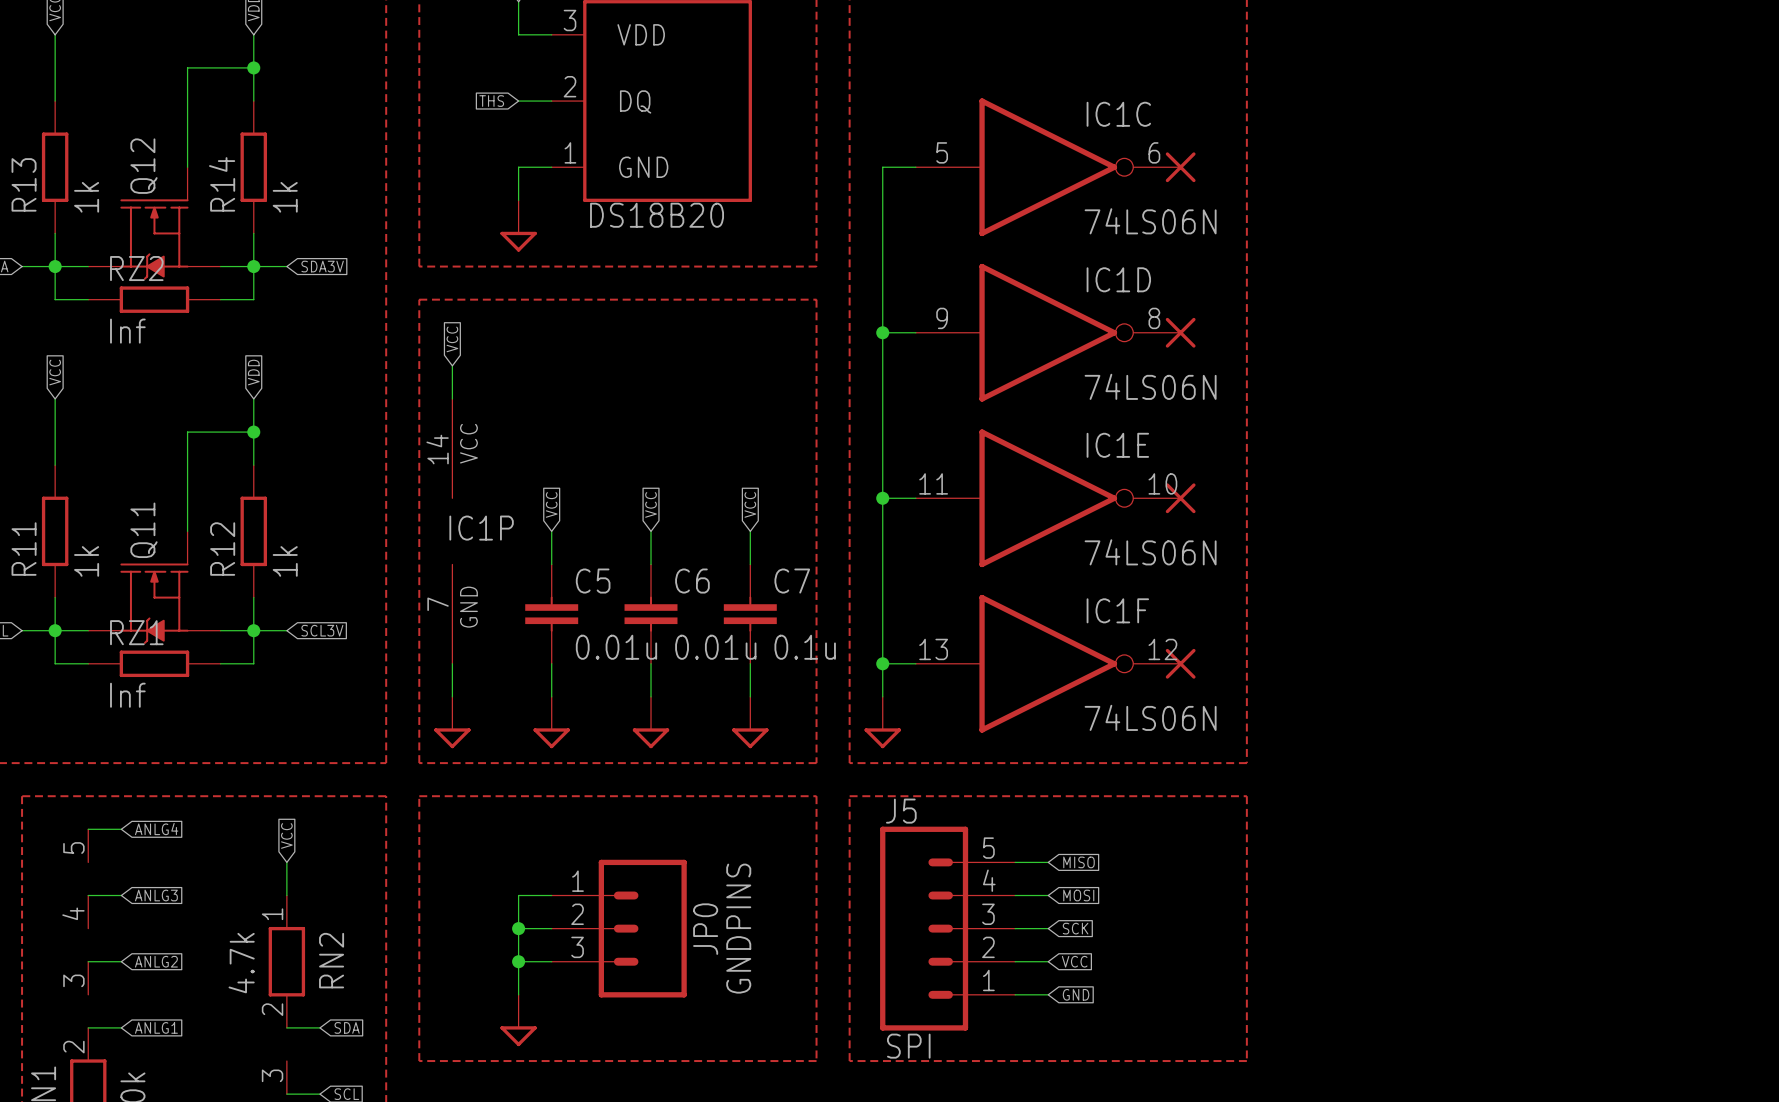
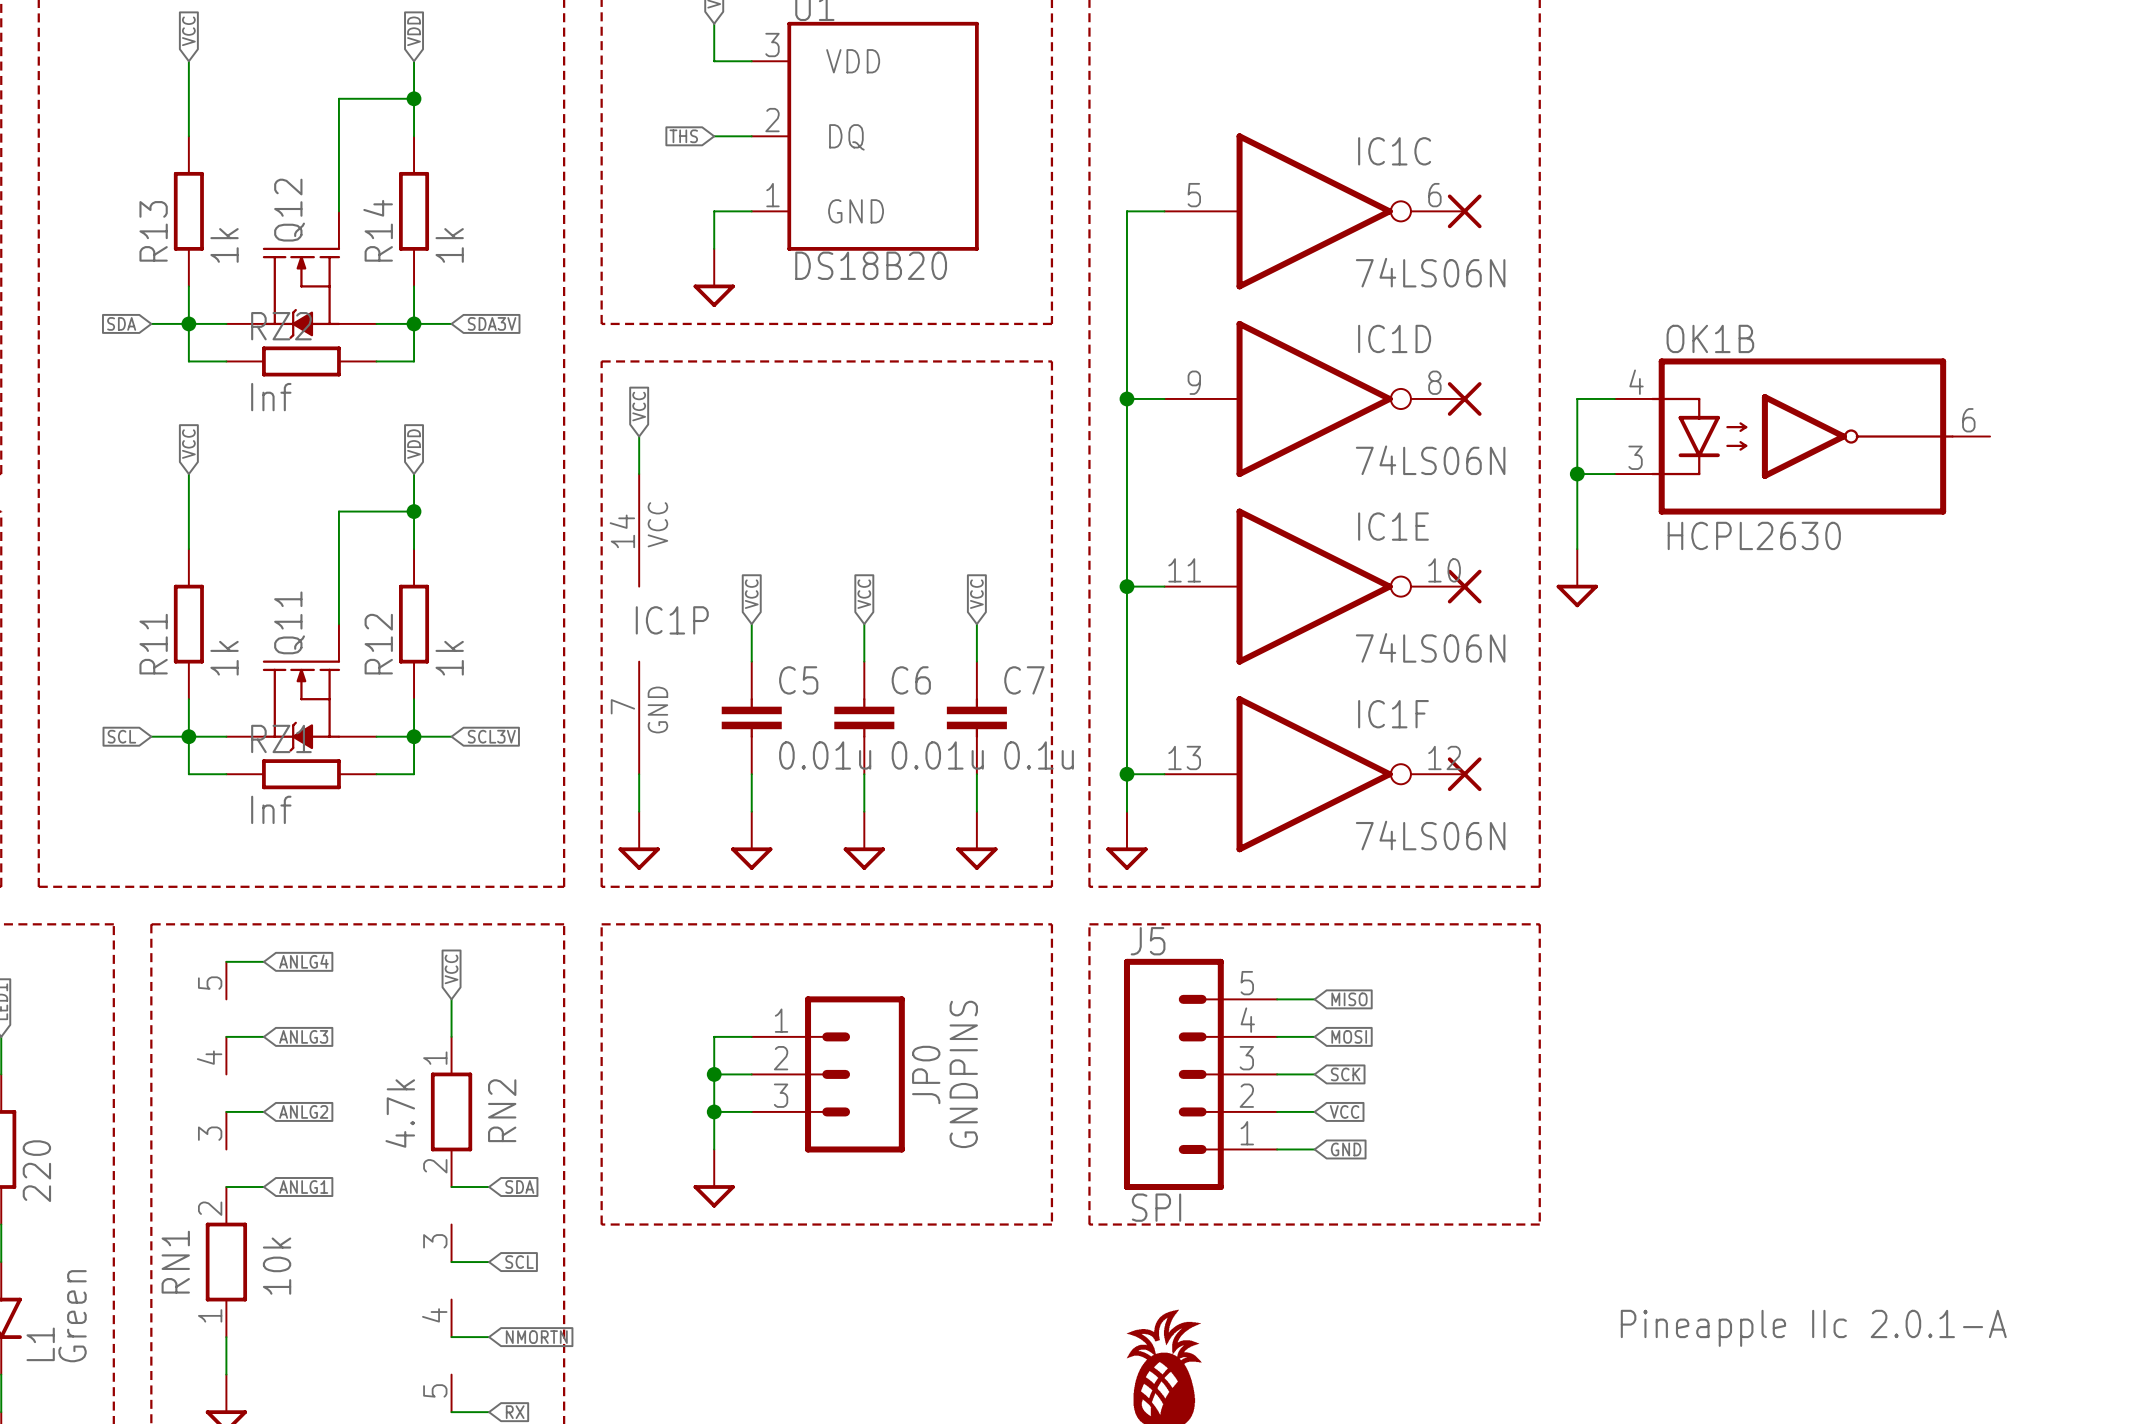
wire: none -> (1614, 398) (1577, 398) (1577, 549)
OK1B: none -> HCPL2630 (1802, 436)
wire: none -> (1577, 474) (1614, 474)
junction: none -> (1577, 474)
power symbol: none -> (1577, 578)

